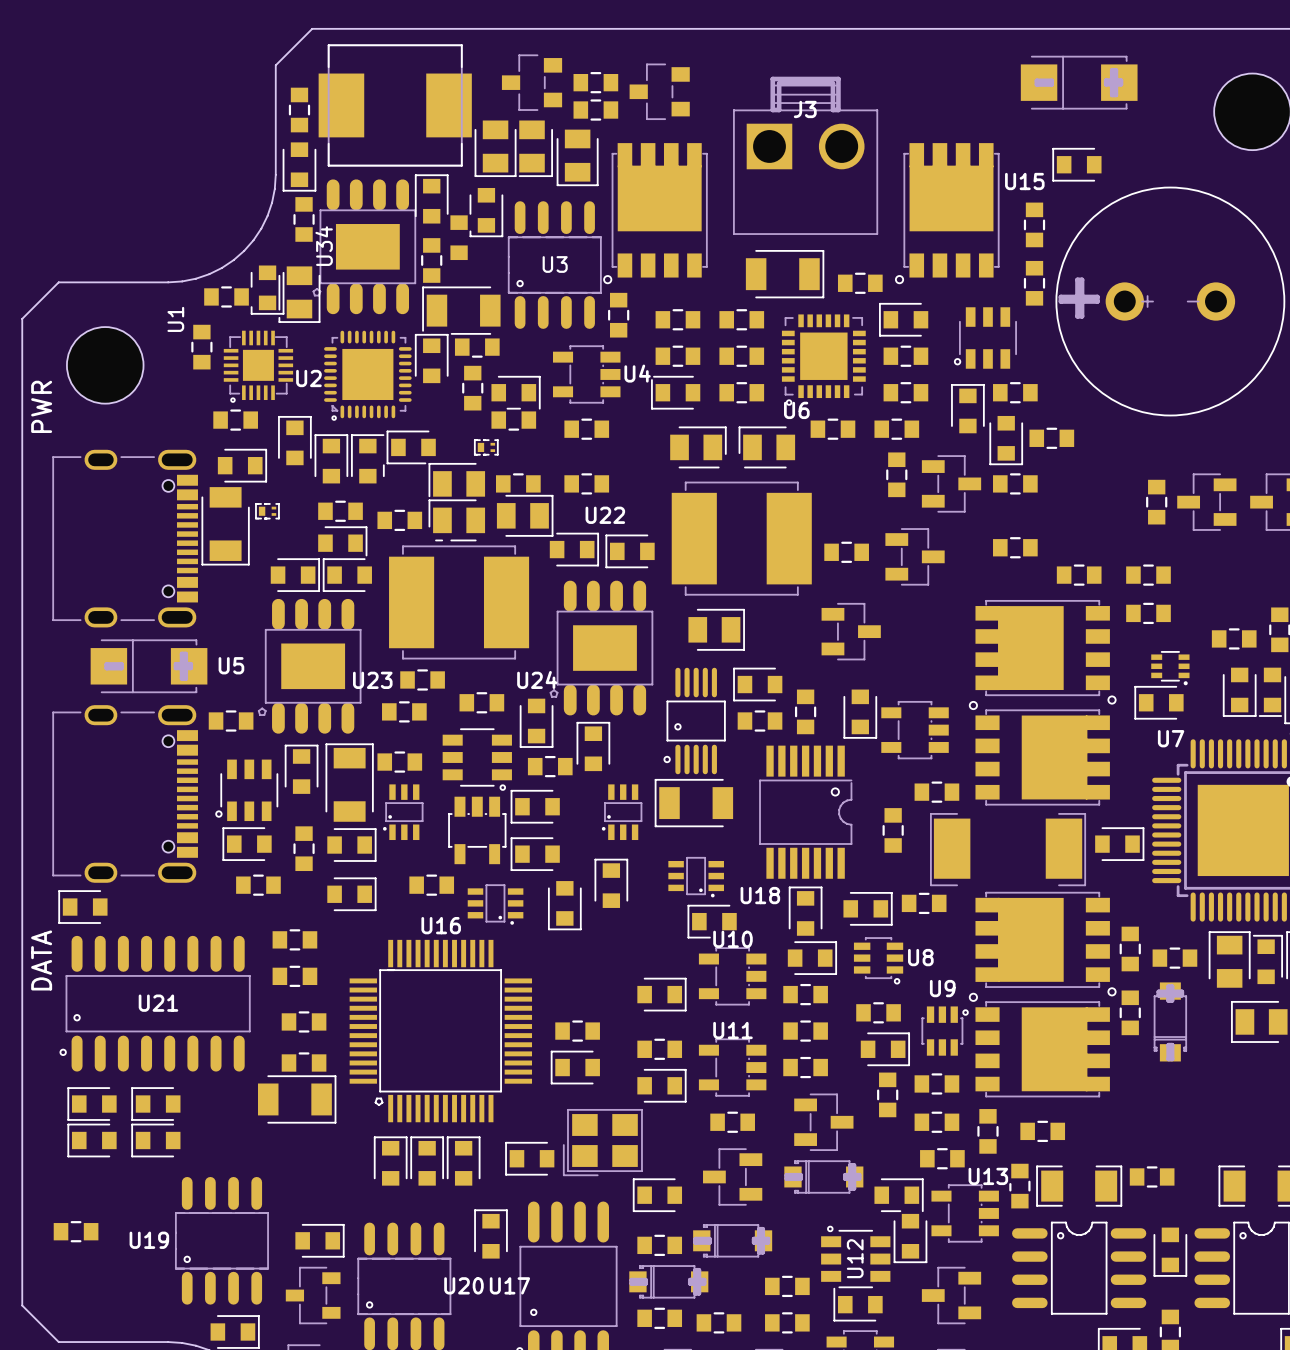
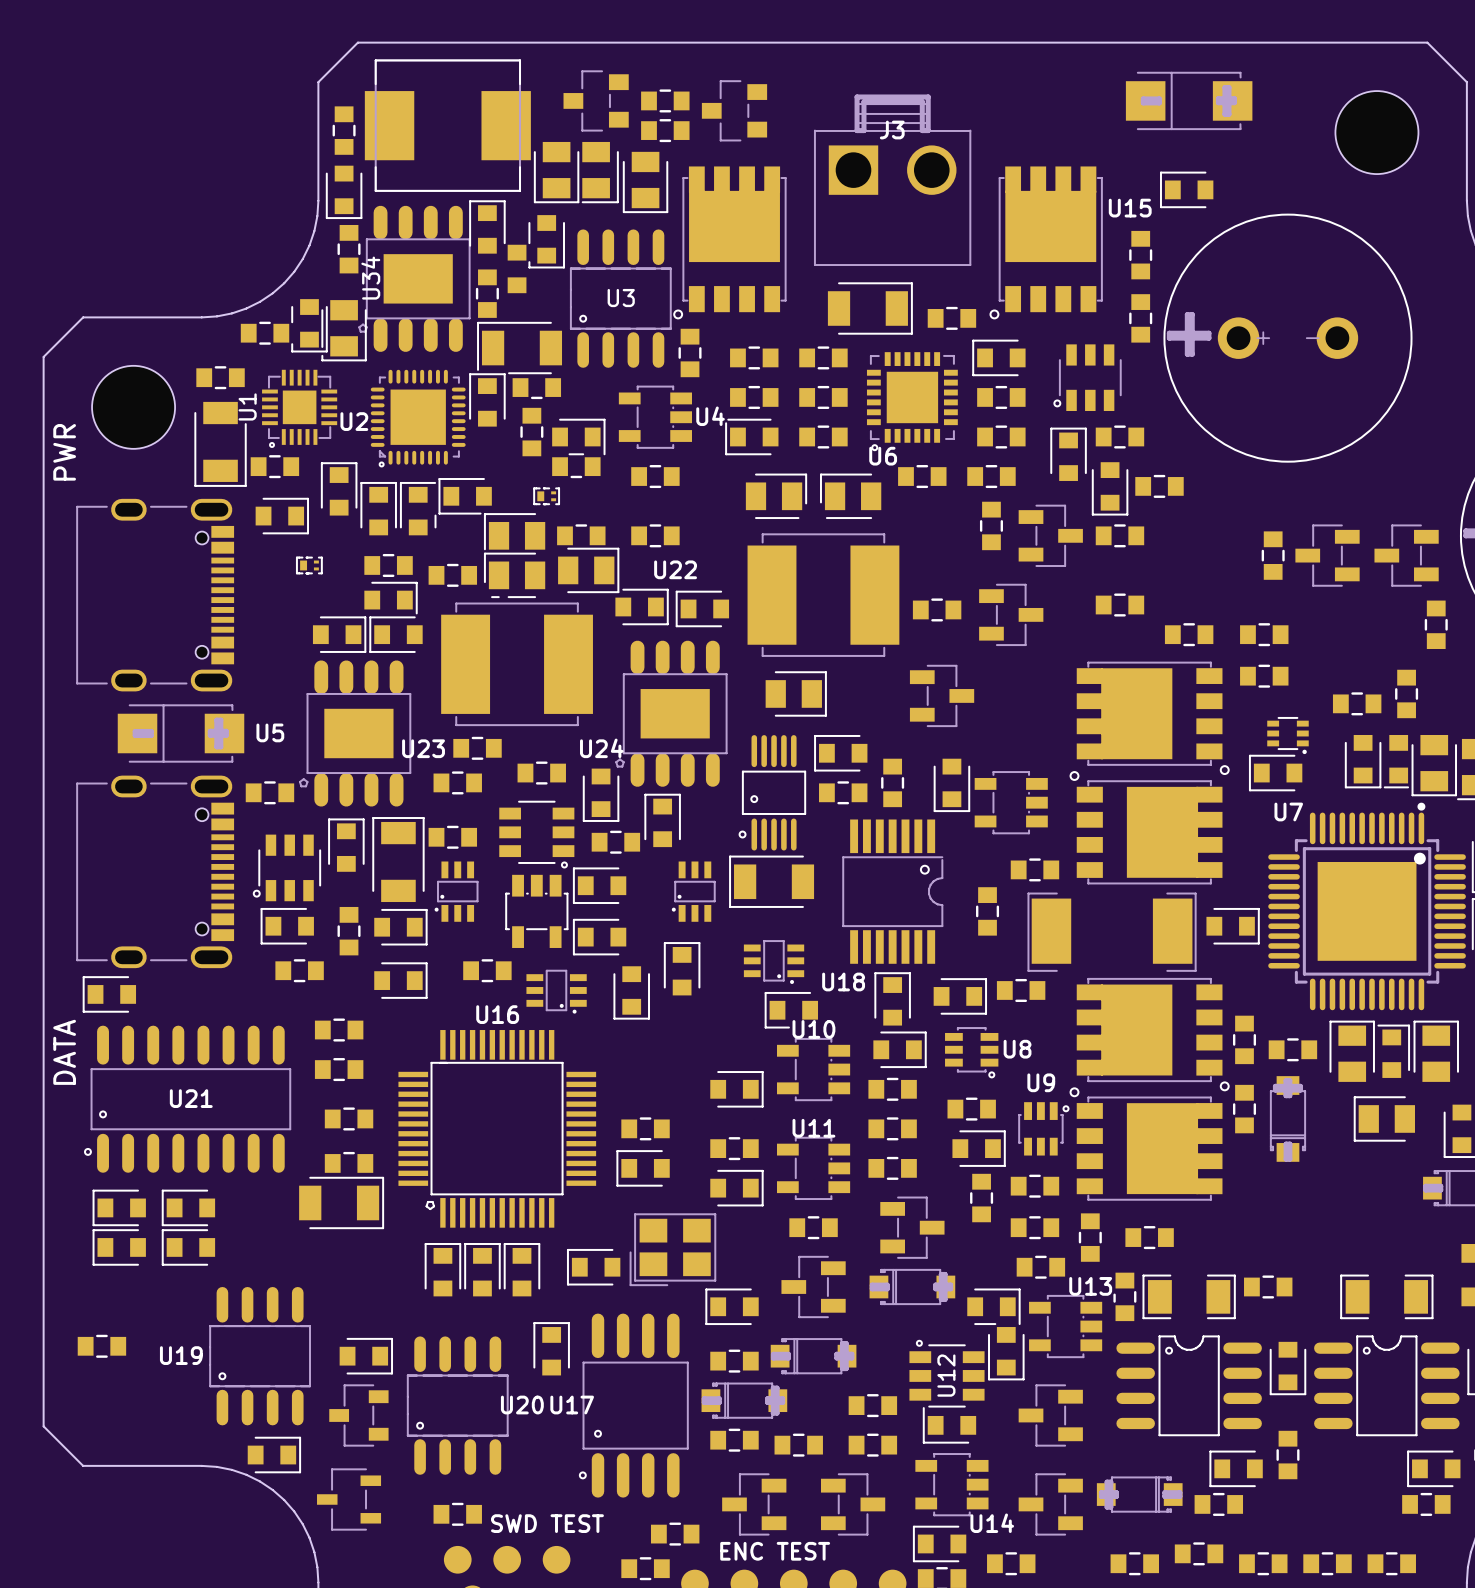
text position: U1 (175, 319) -> U1 (247, 406)
part rotation: 0° (201, 347) -> 90° clockwise (220, 377)
part position: (225, 526) -> (220, 444)

